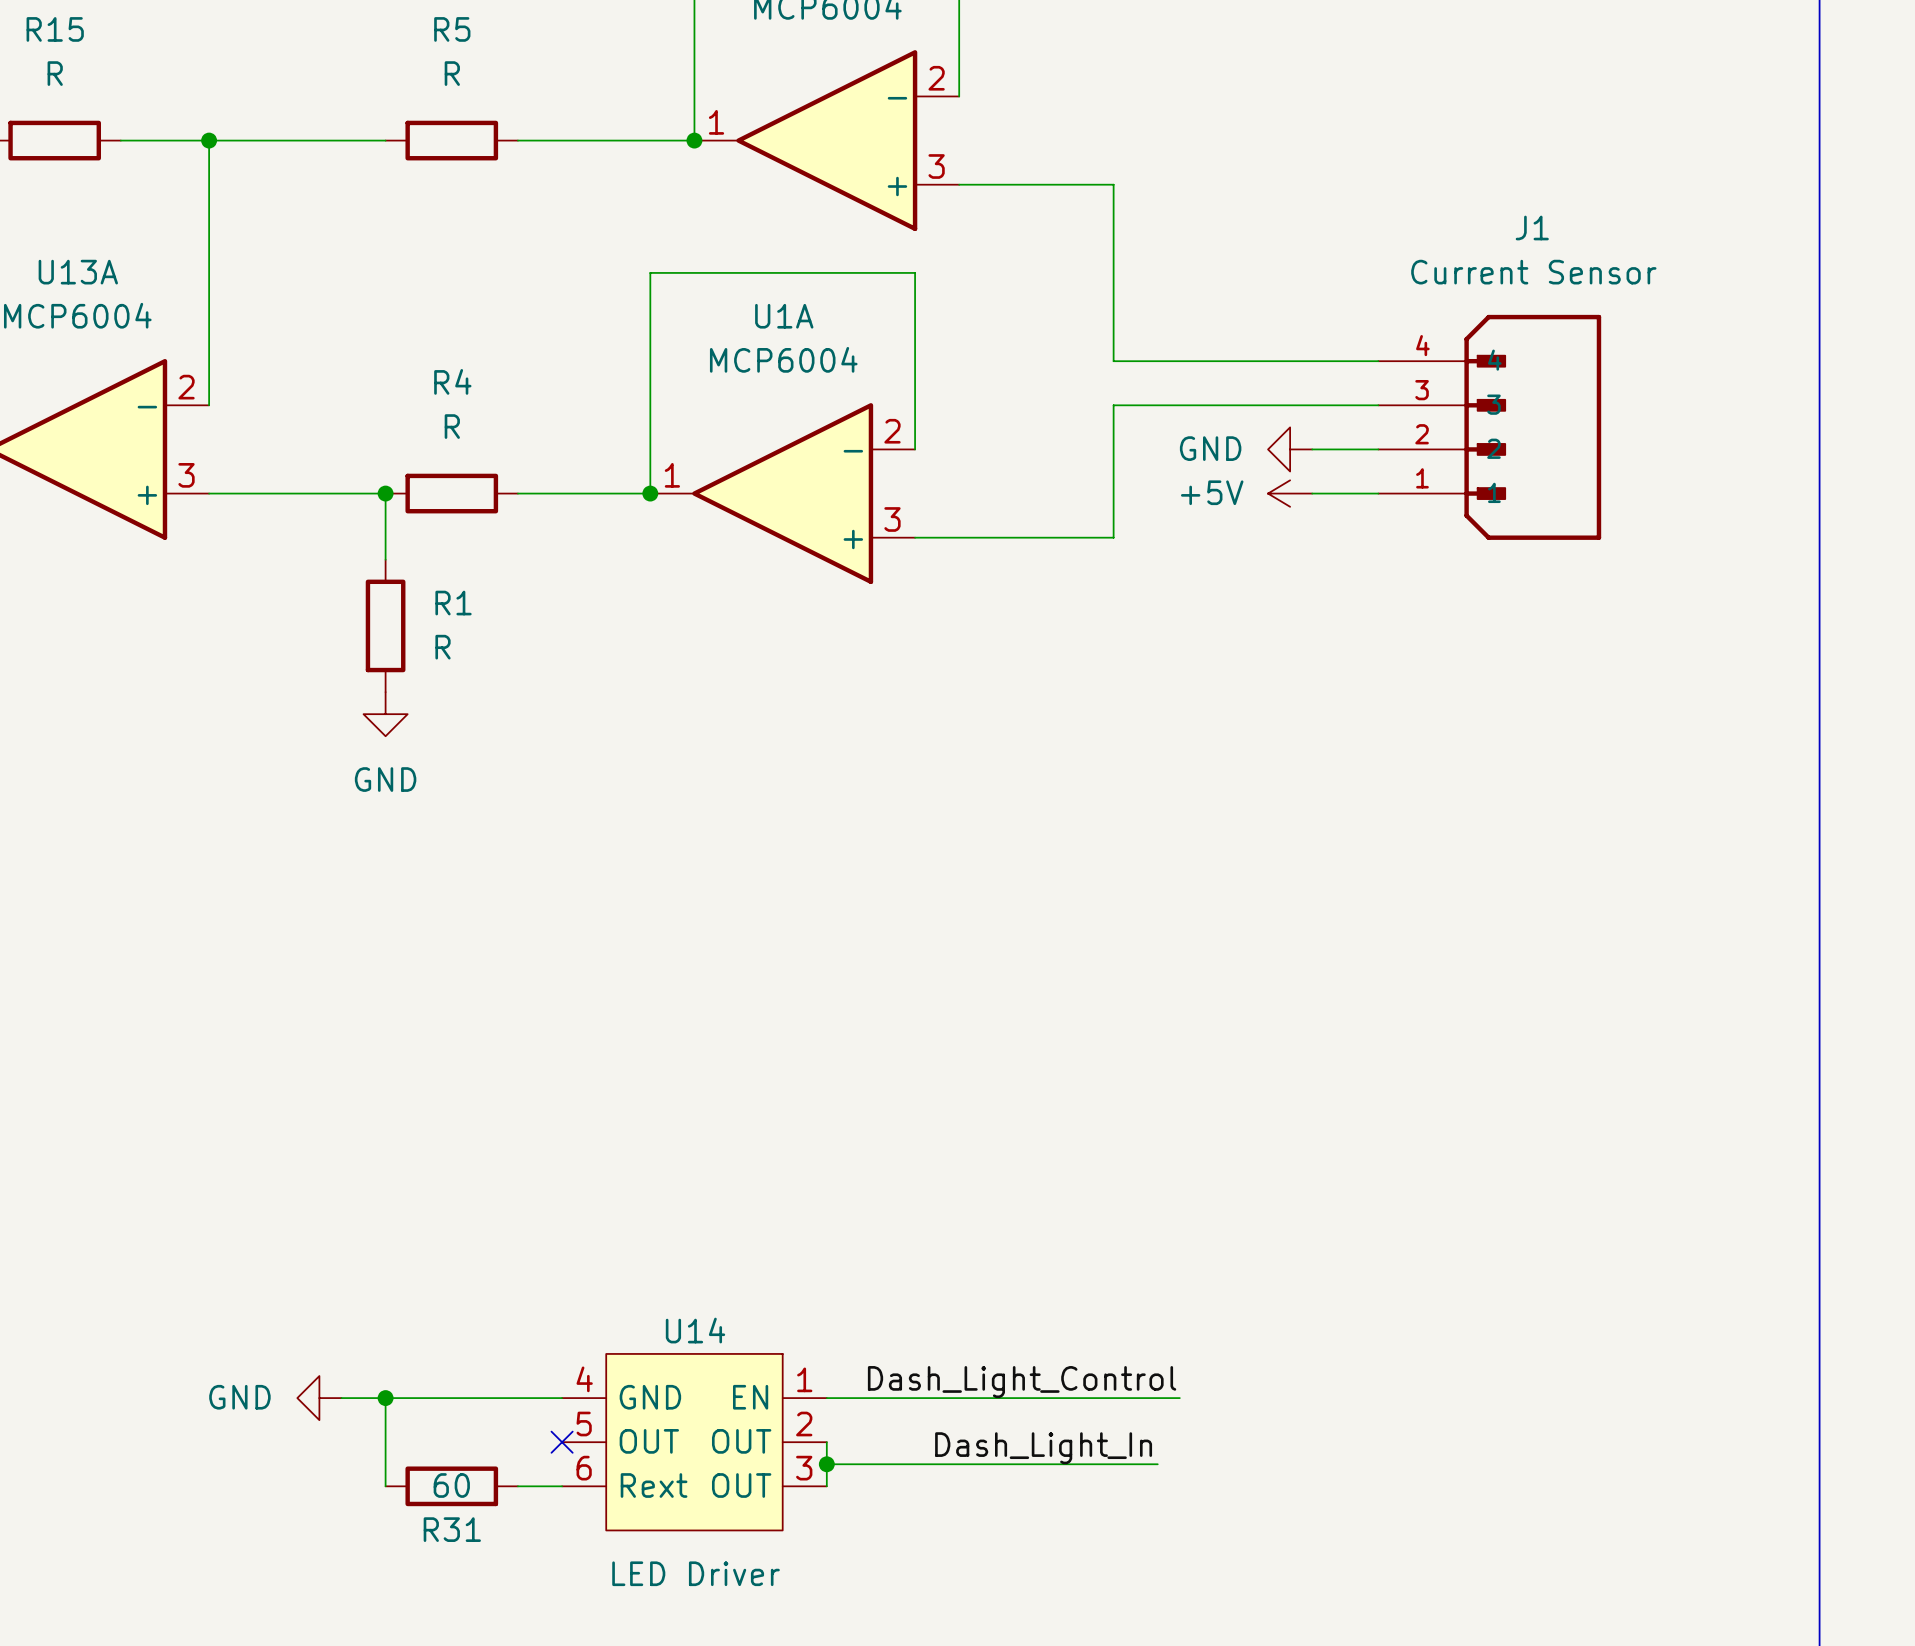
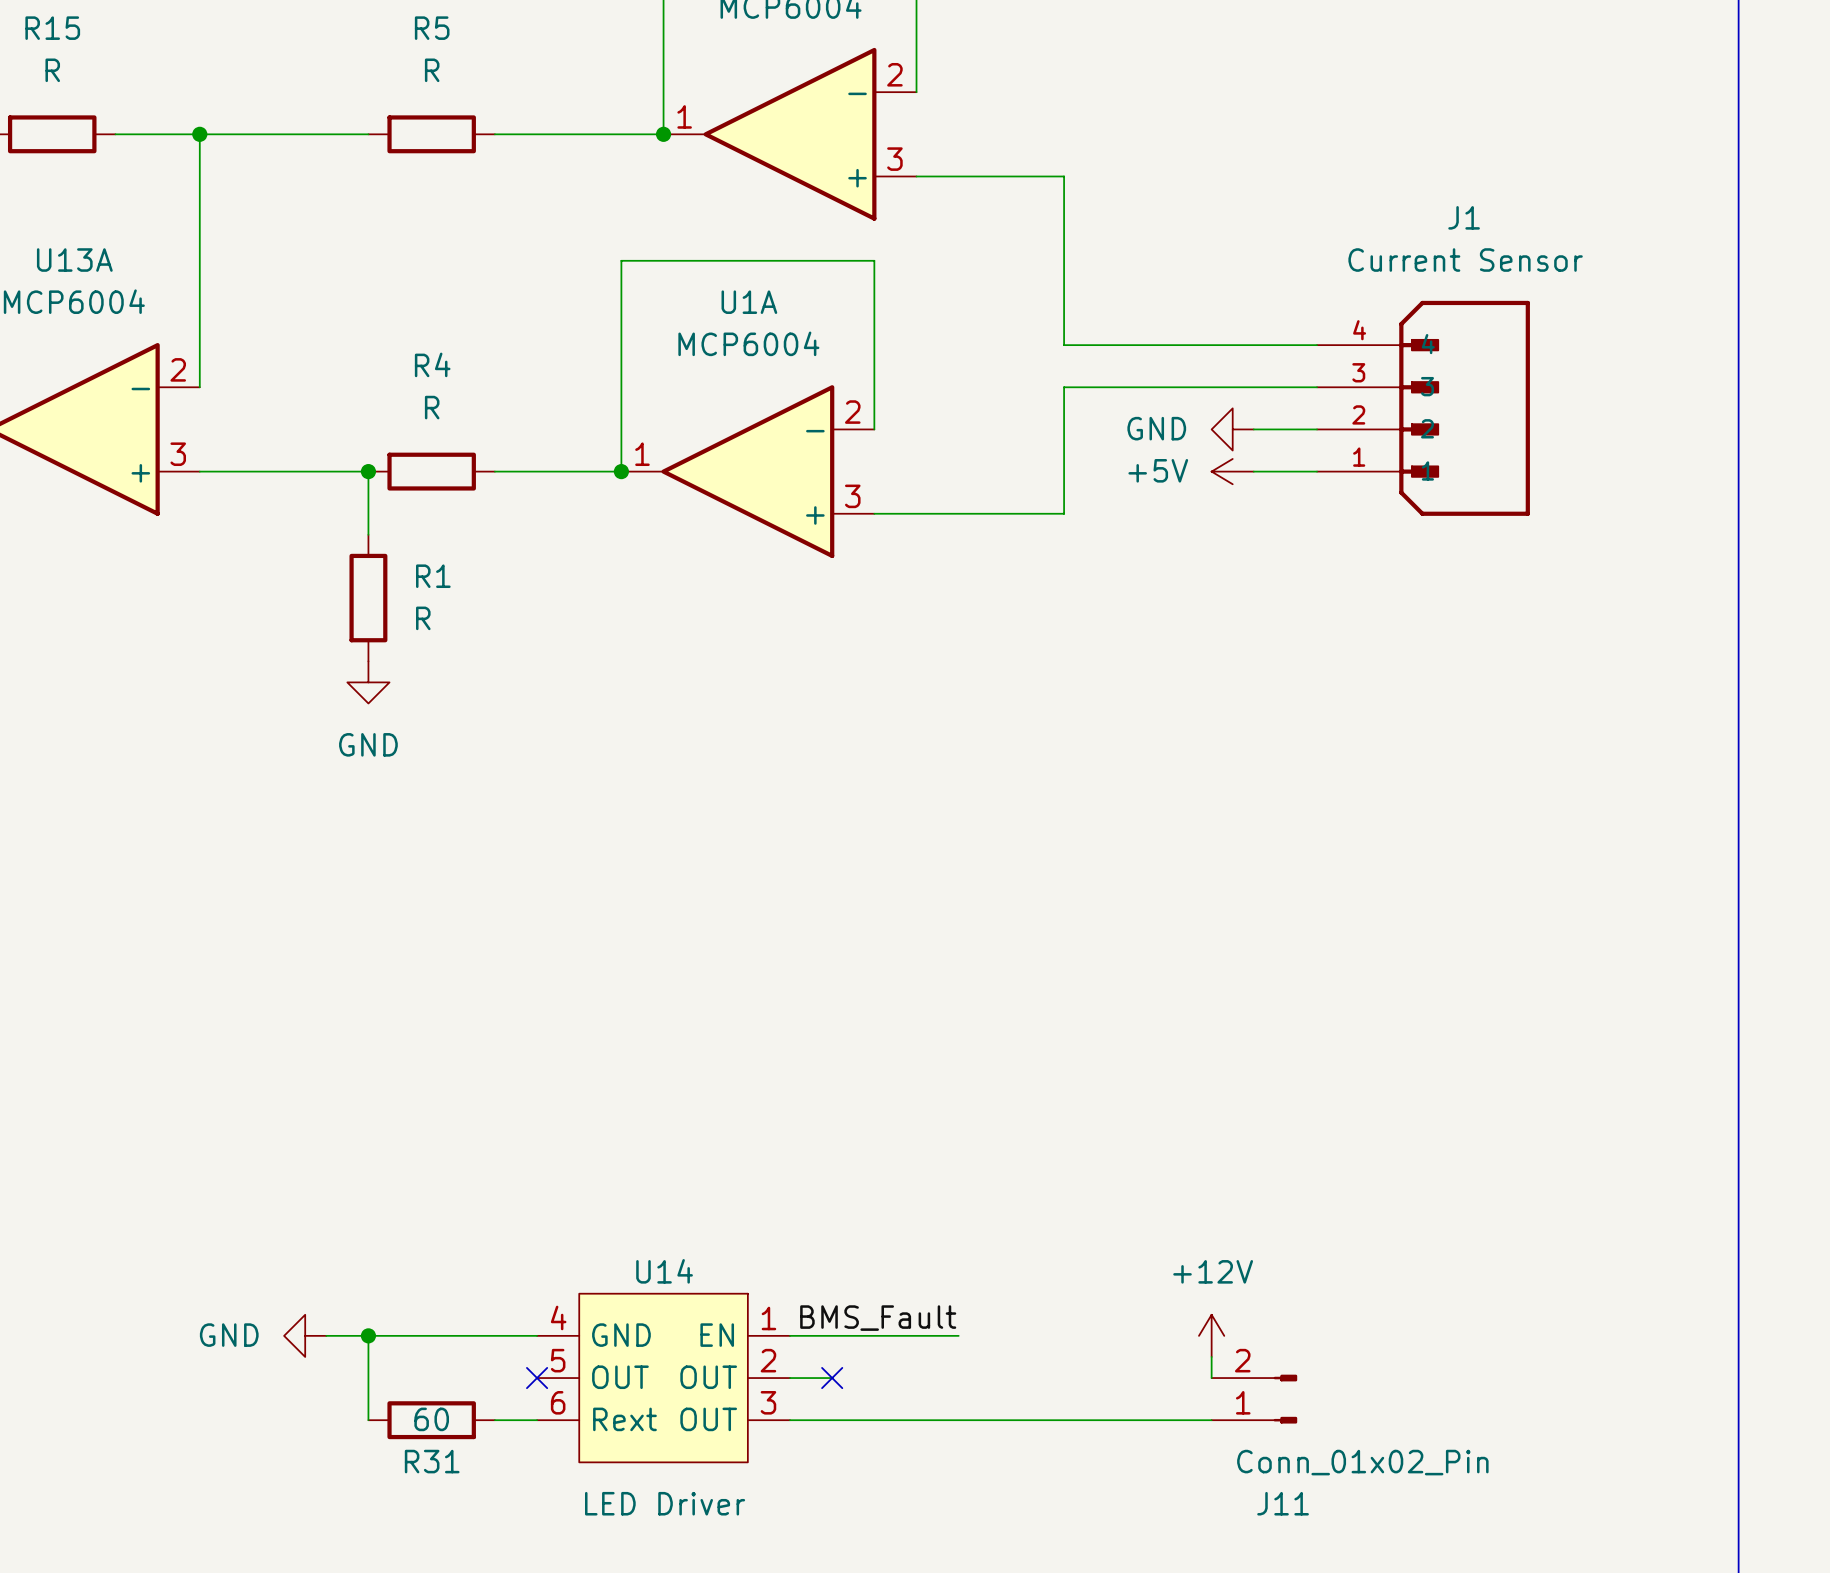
label: none -> BMS_Fault (878, 1318)
label: Dash_Light_Control (1022, 1382) -> none
wire: (1003, 1398) (1179, 1398) -> none
power symbol: none -> +12V (1211, 1335)
wire: none -> (1211, 1356) (1211, 1378)
wire: (826, 1442) (826, 1486) -> (790, 1378) (832, 1378)
no-connect mark: none -> (832, 1378)
label: Dash_Light_In (1043, 1448) -> none
wire: (826, 1464) (1157, 1464) -> none
junction: (826, 1464) -> none
J11: none -> Conn_01x02_Pin (1254, 1399)
wire: none -> (790, 1420) (1211, 1420)

